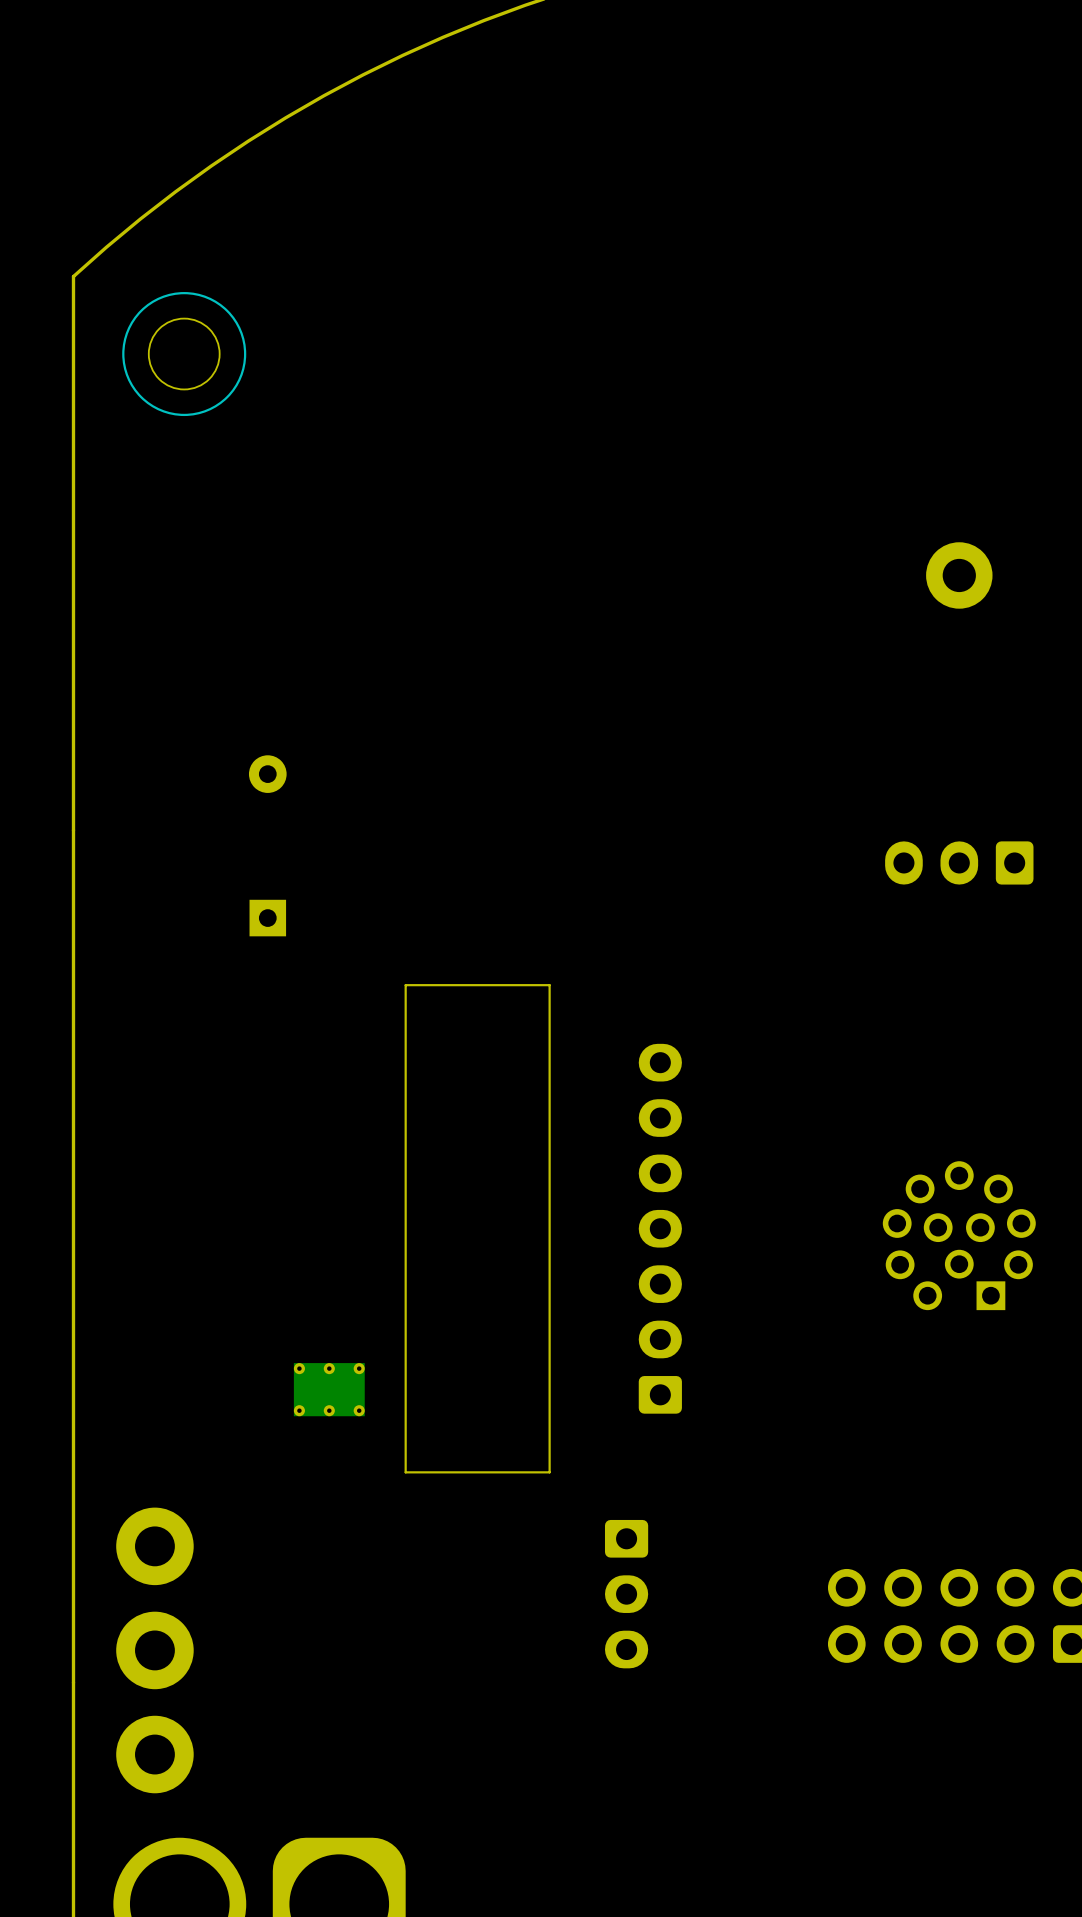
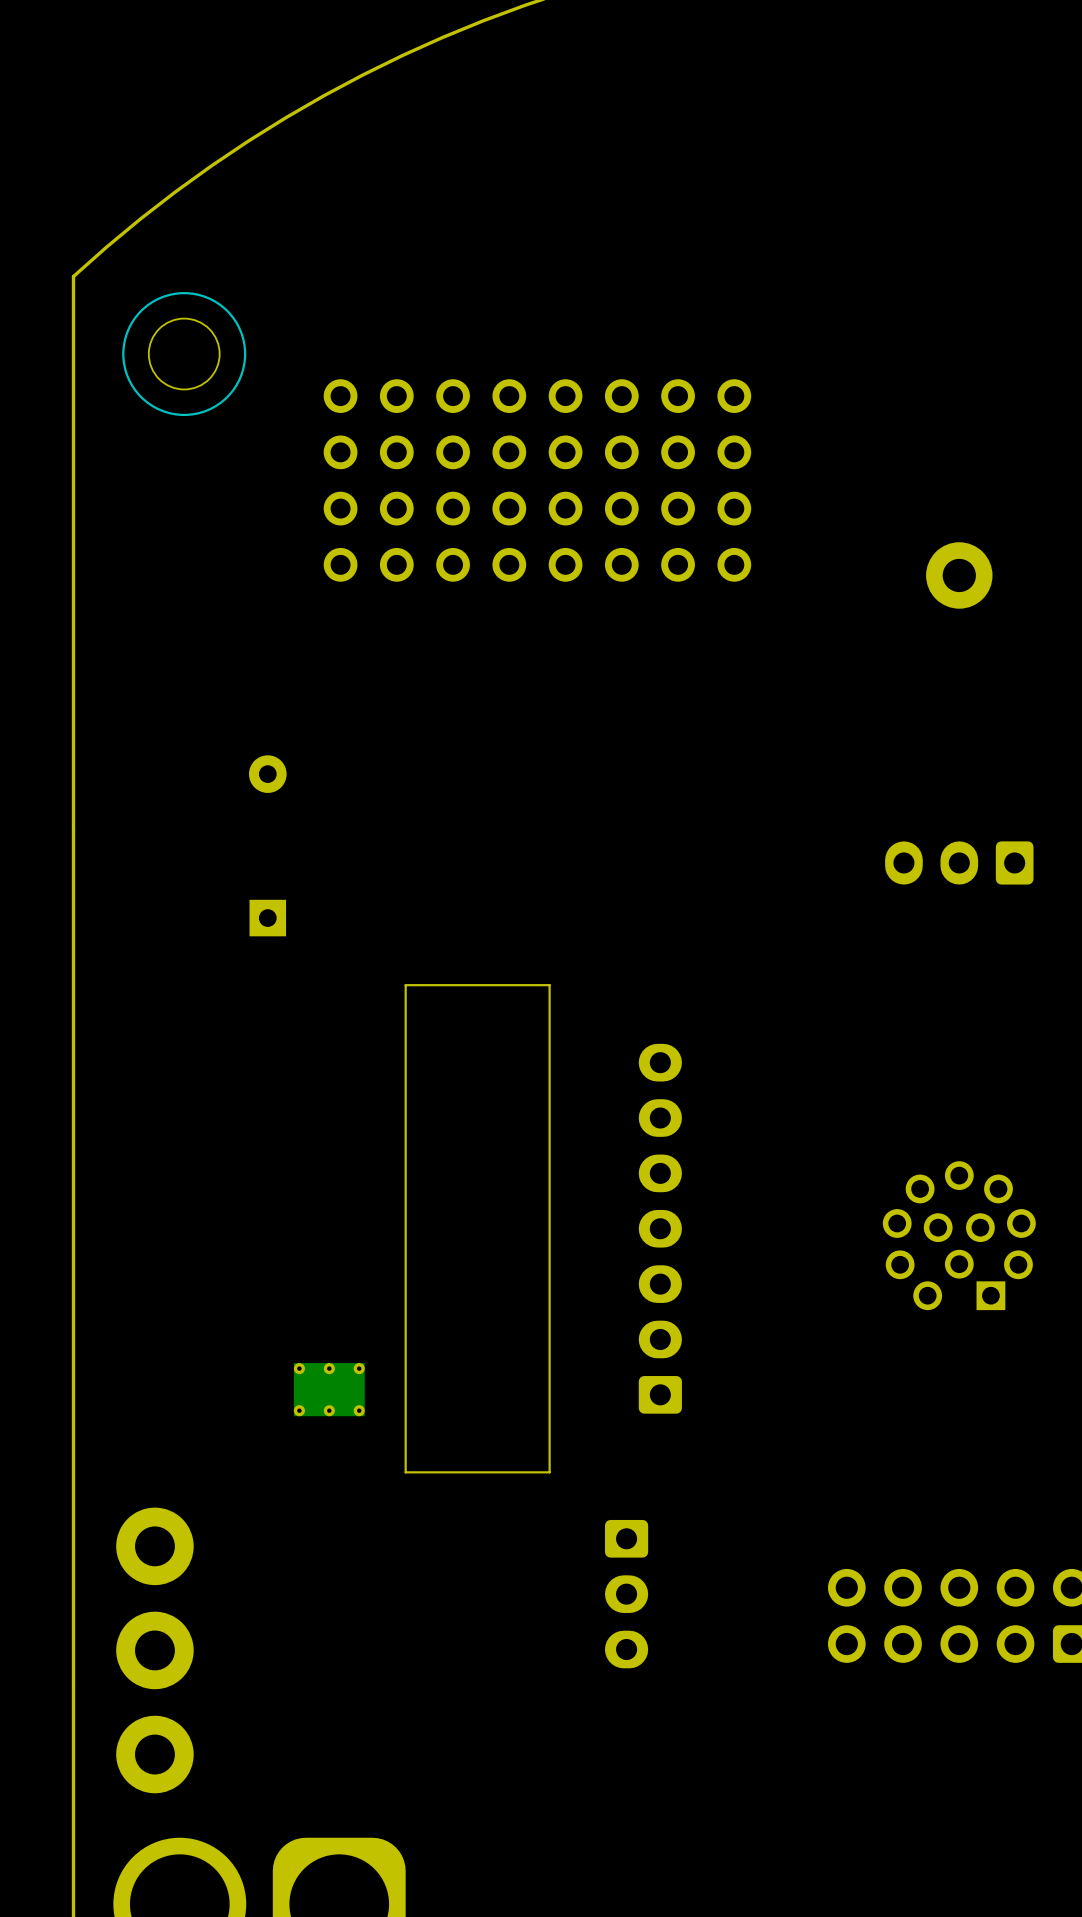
part: none -> (424, 480)
part: none -> (649, 480)

